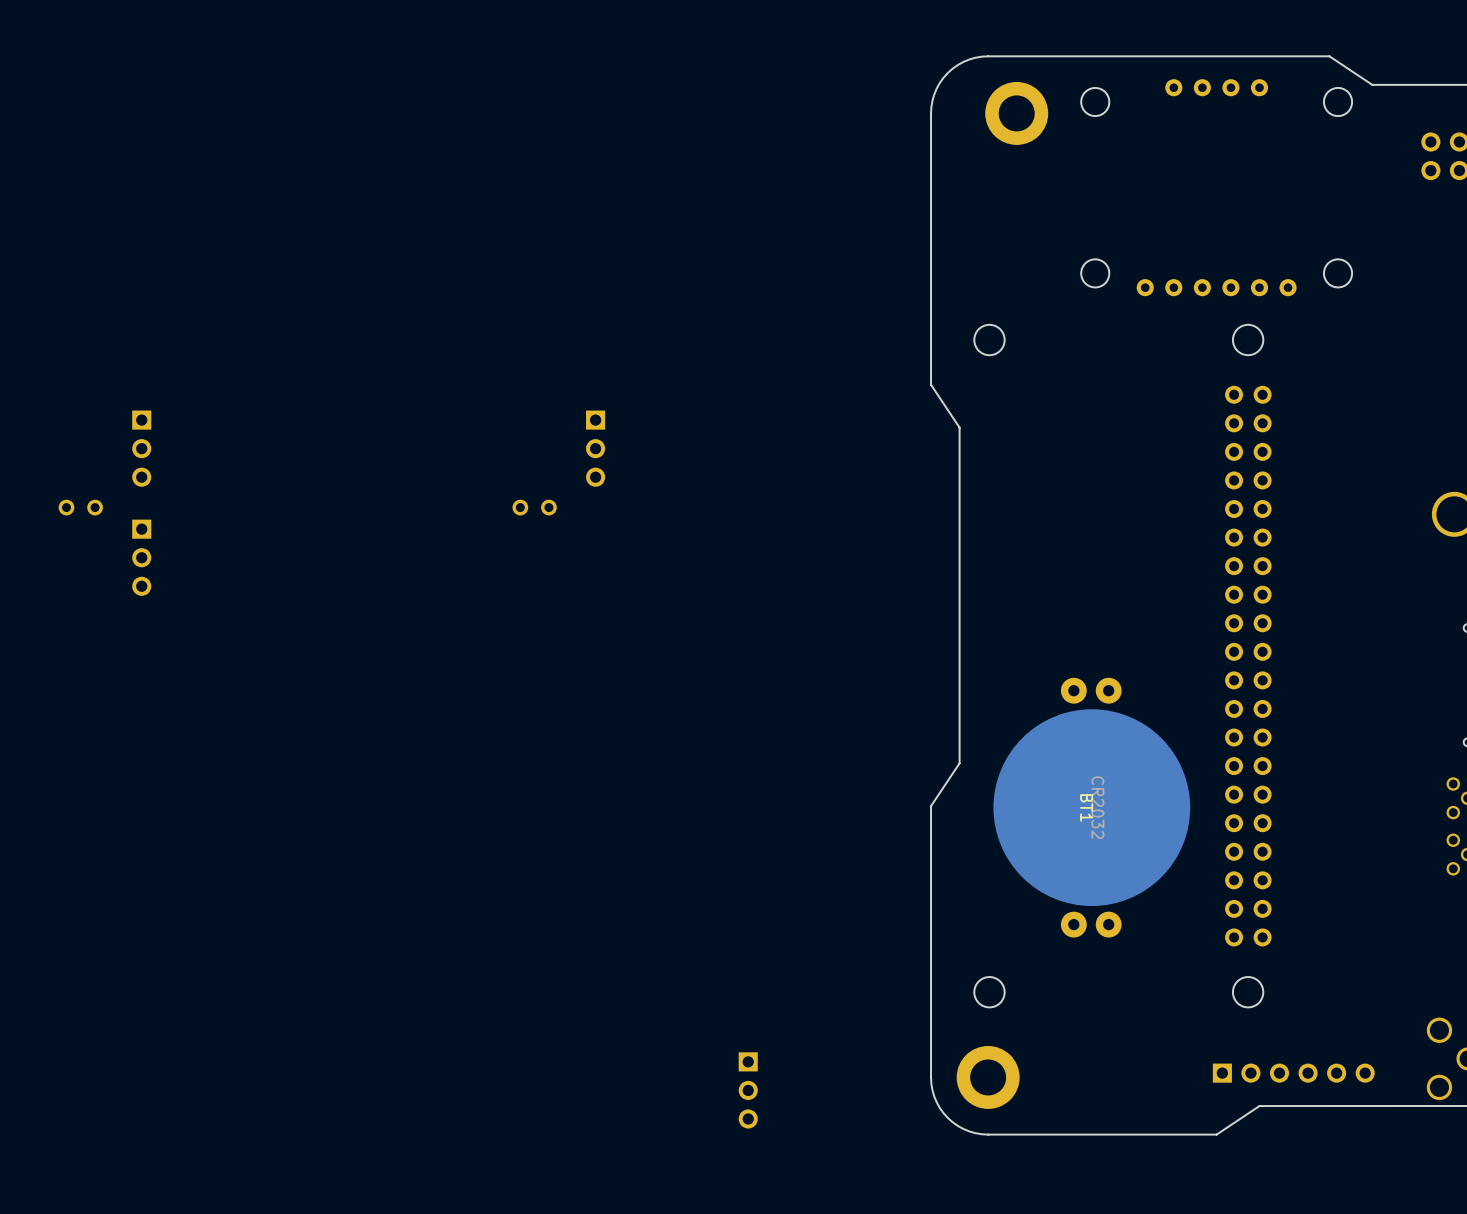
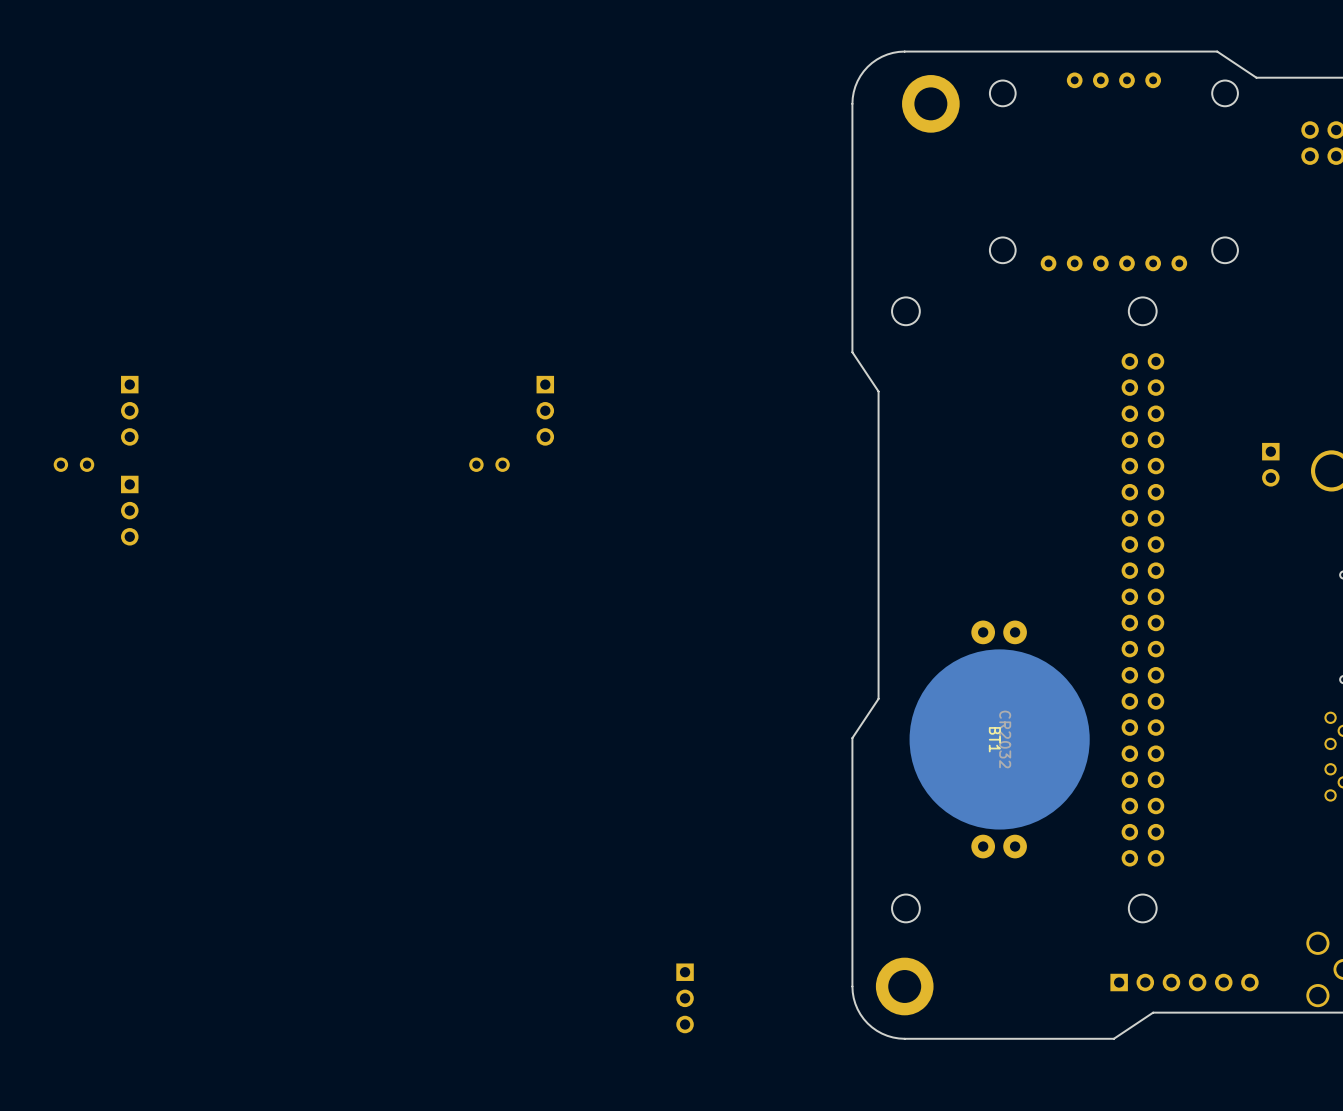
part: none -> (1270, 464)

